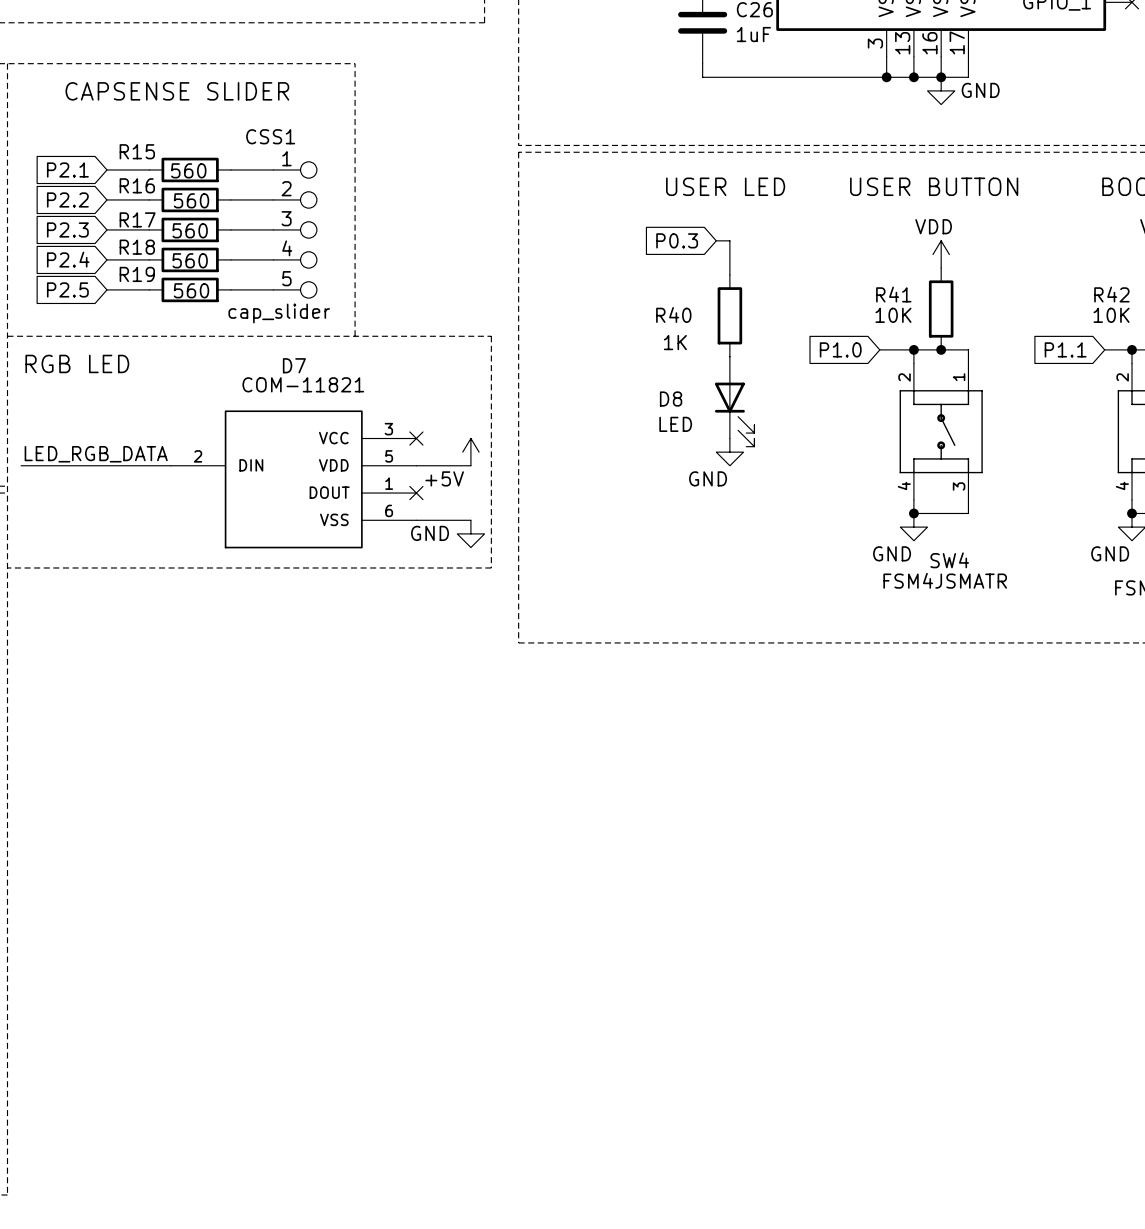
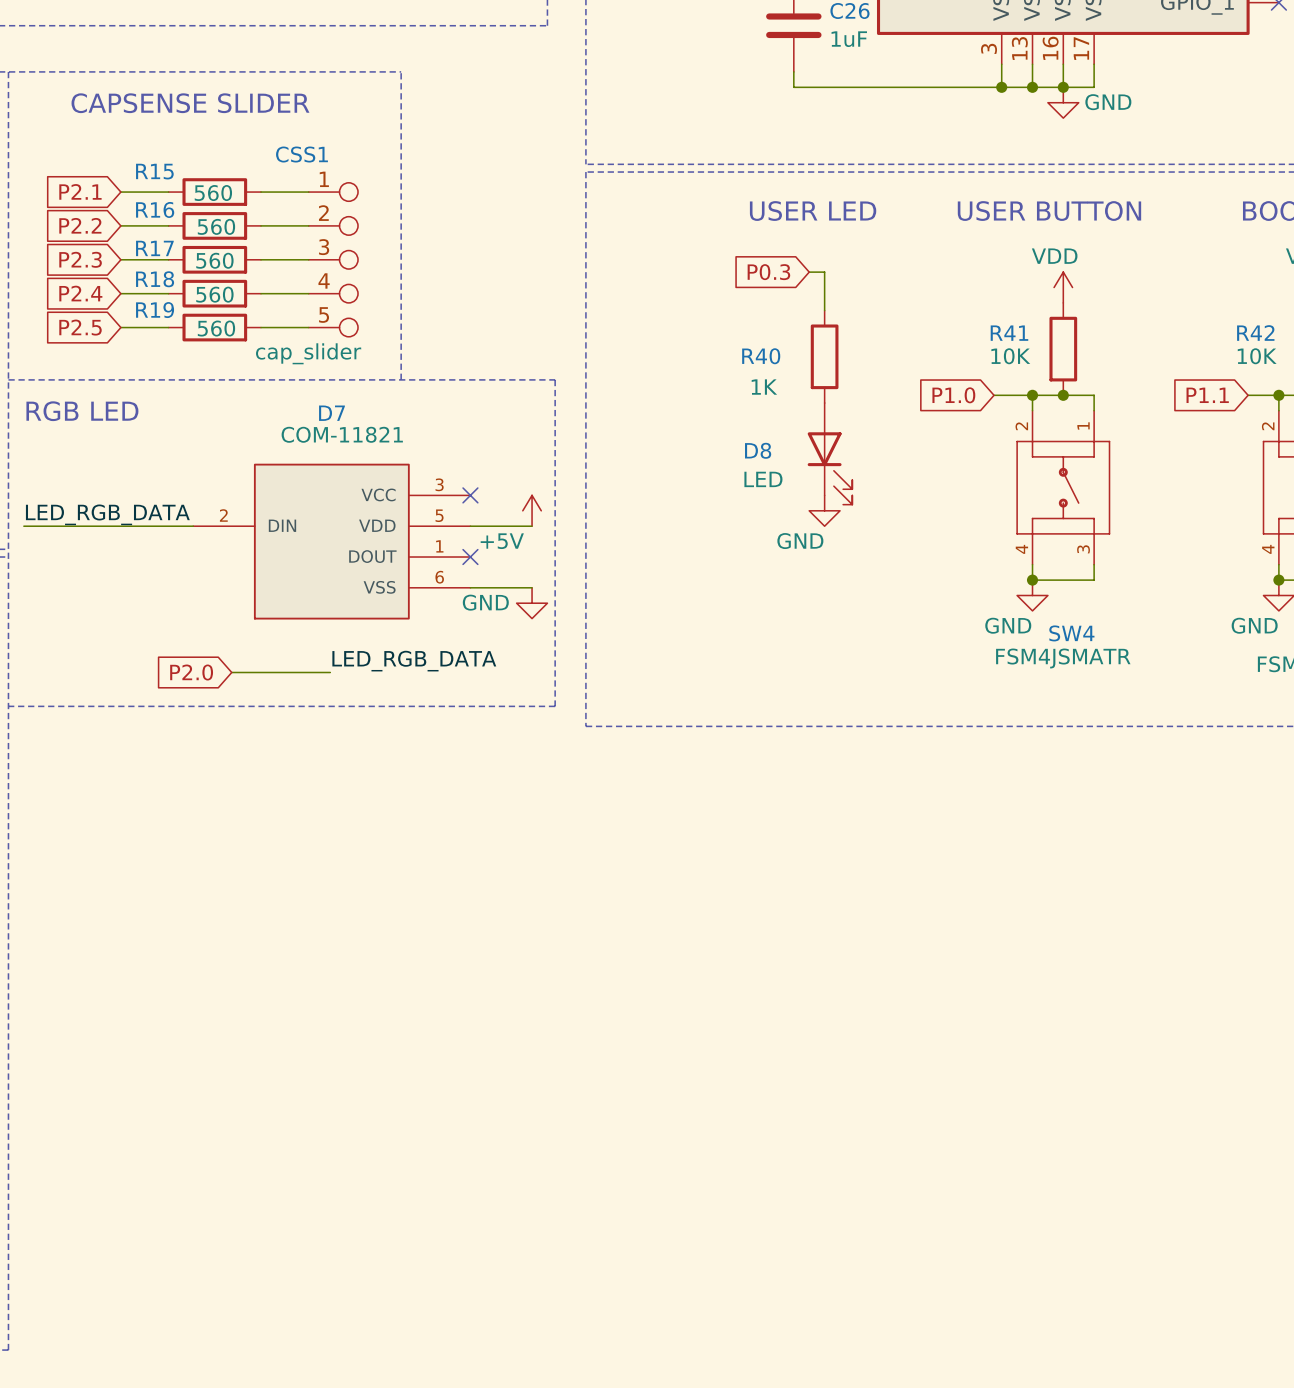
line: (7, 567) (491, 567) -> (8, 706) (555, 706) (555, 641)
label: none -> LED_RGB_DATA (414, 661)
global label: none -> P2.0 (191, 672)
wire: none -> (231, 672) (330, 672)

